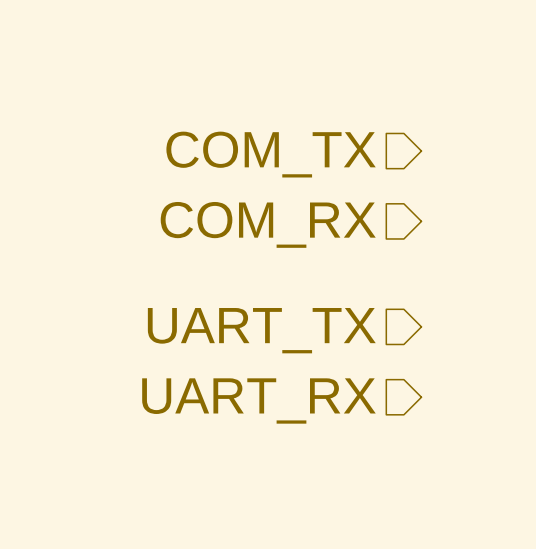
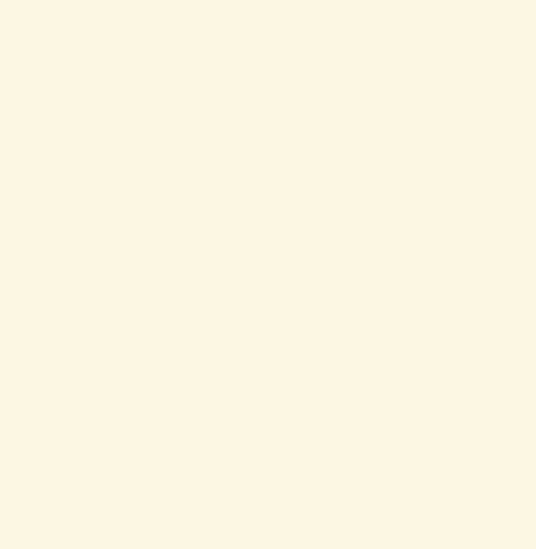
hierarchical label: COM_TX (271, 154) -> none
hierarchical label: COM_RX (268, 224) -> none
hierarchical label: UART_TX (261, 330) -> none
hierarchical label: UART_RX (258, 400) -> none

